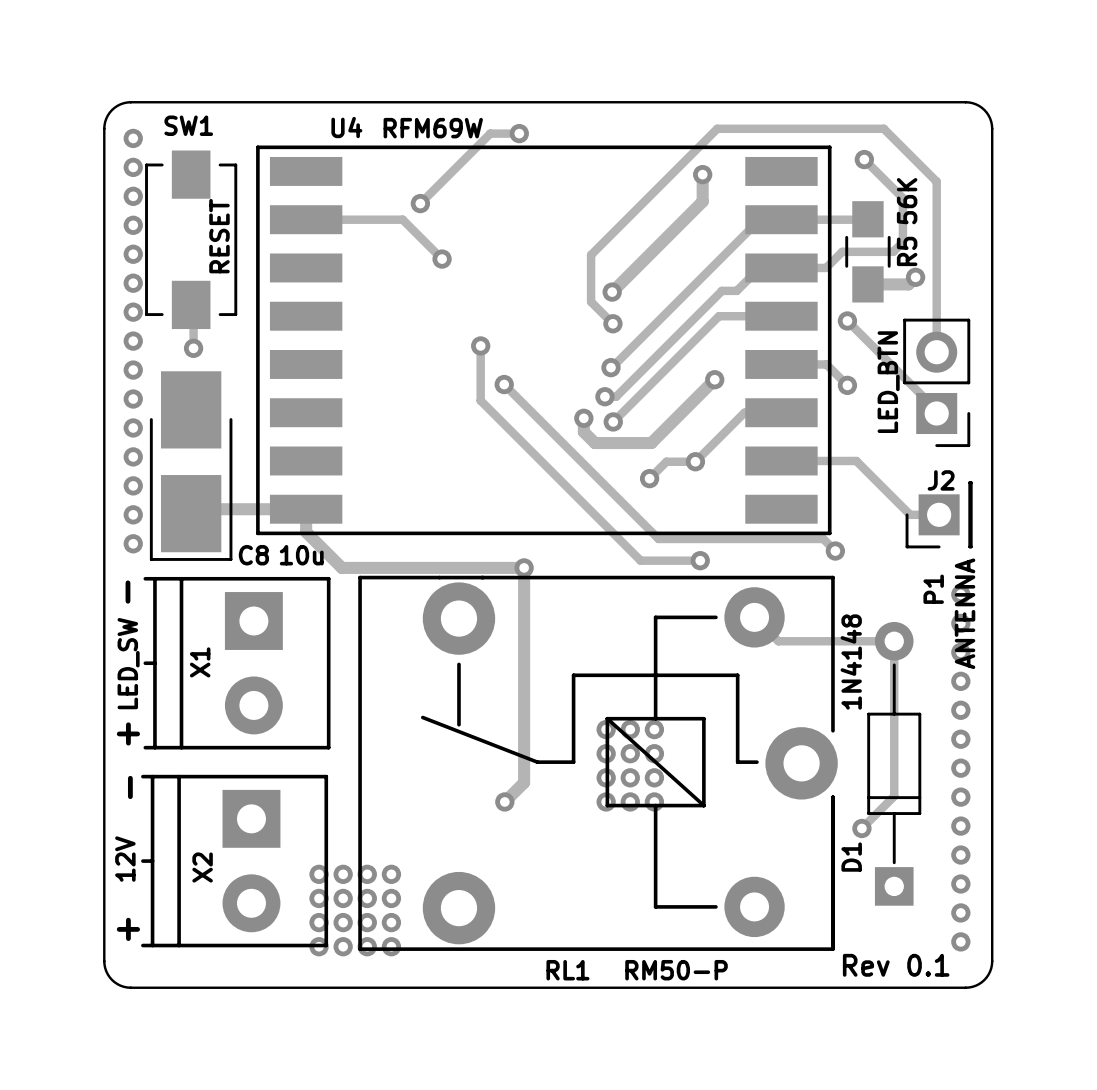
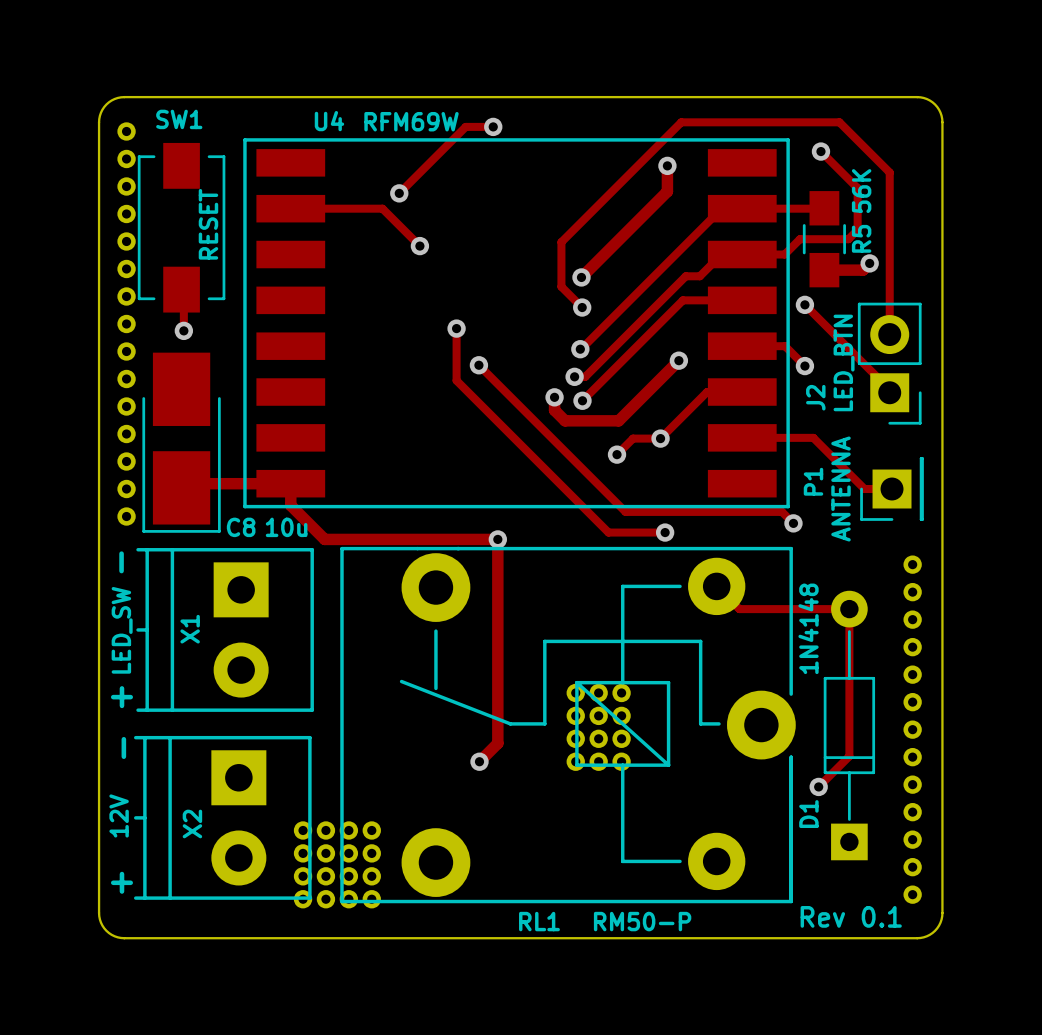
J2 name rotation: 0° (941, 480) -> 90° counterclockwise (815, 397)
J2 name position: J2 (941, 480) -> J2 (815, 397)
P1 name position: P1 (933, 589) -> P1 (813, 481)
P1 value position: ANTENNA (965, 613) -> ANTENNA (841, 489)

